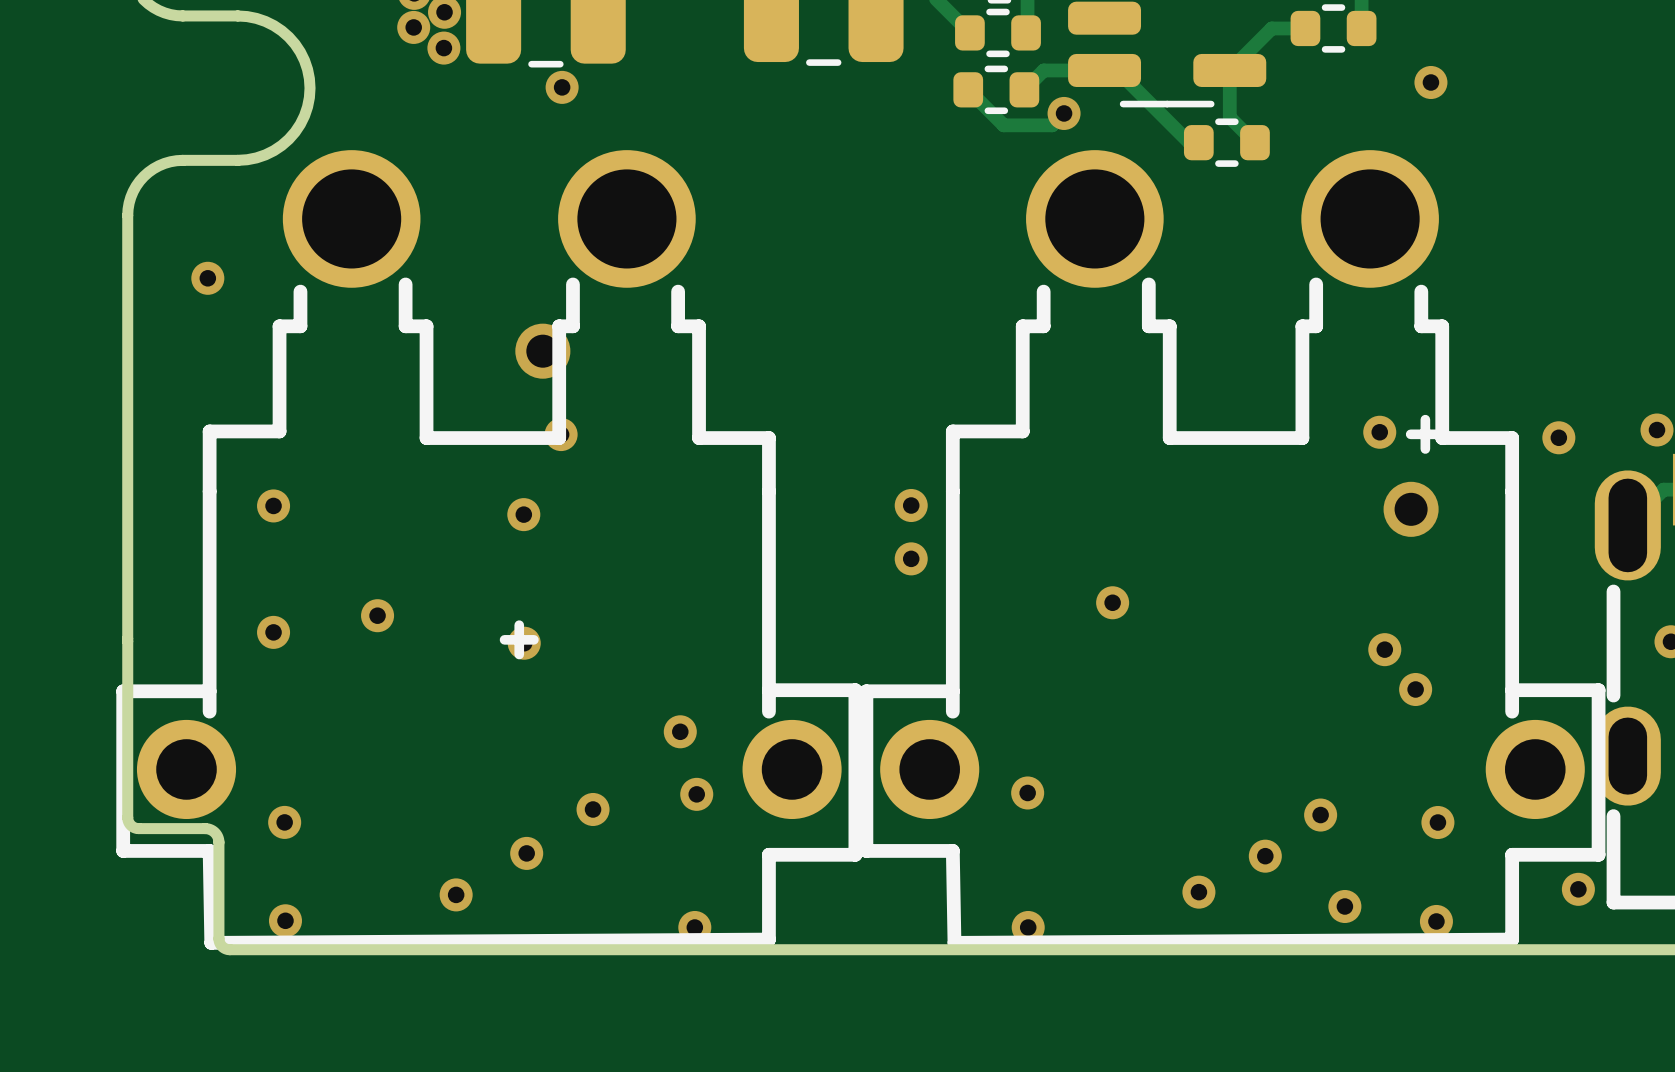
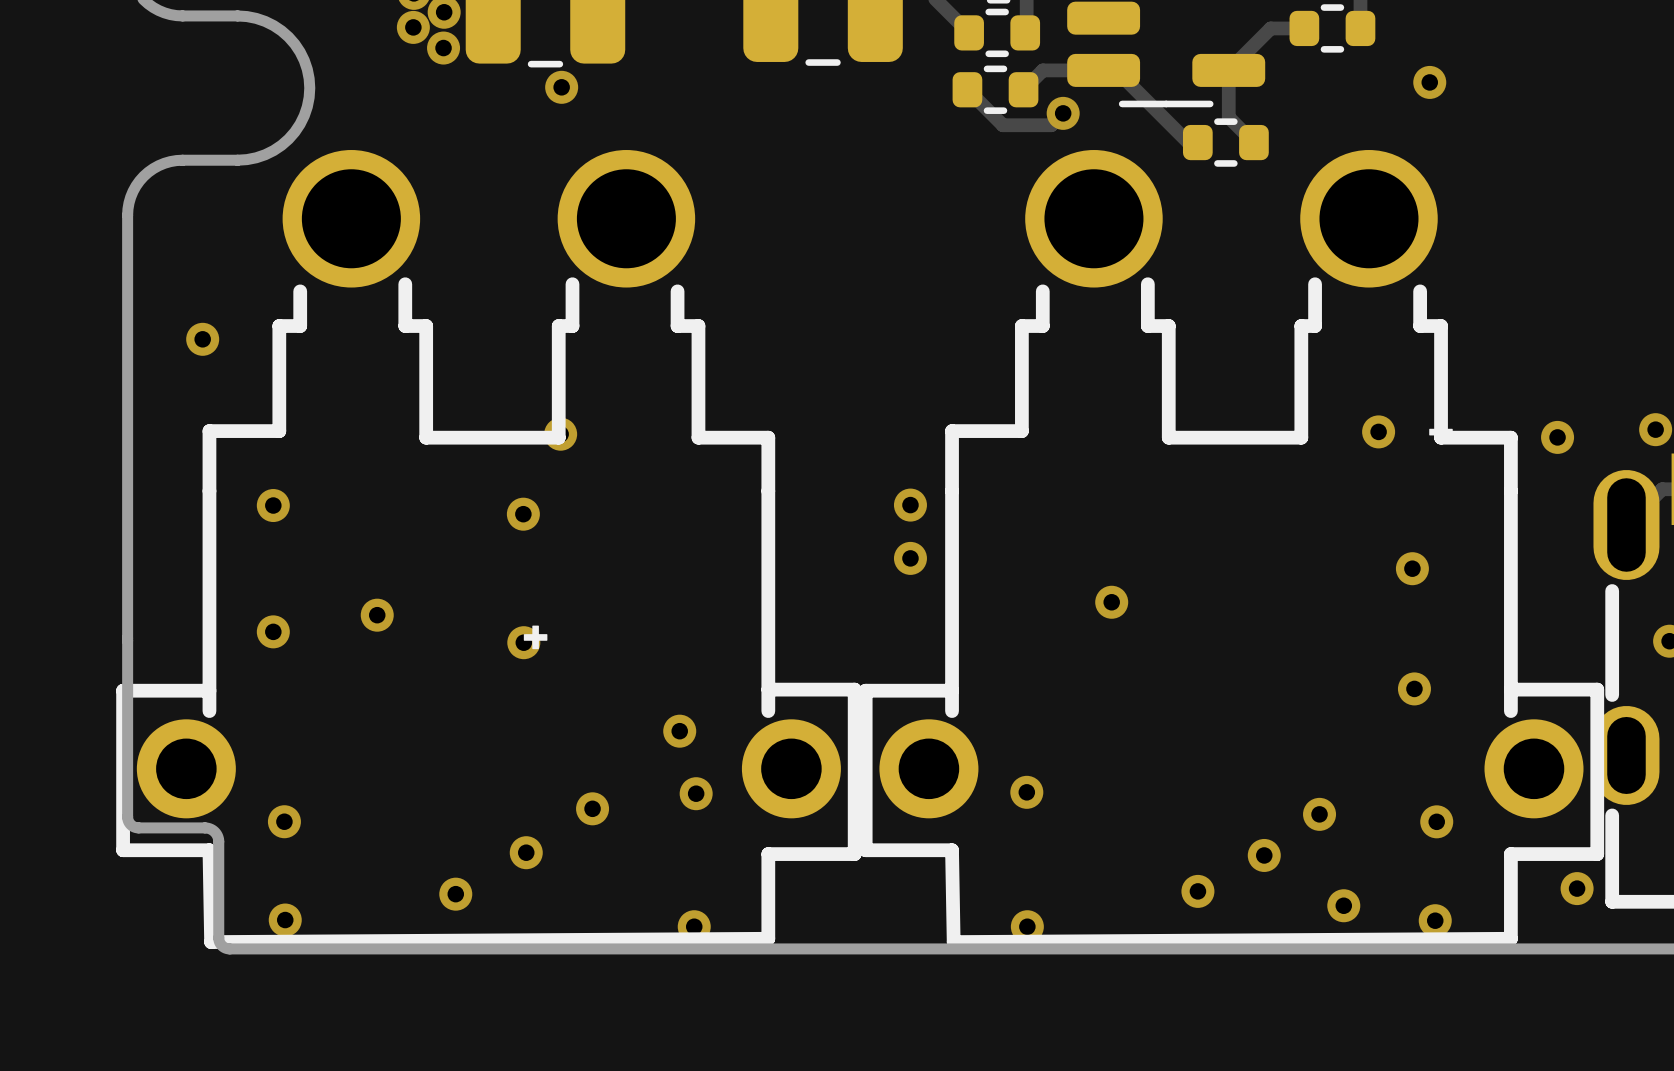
via position: (207, 278) -> (202, 339)
via: (542, 351) -> none
via: (1411, 509) -> none
via position: (1384, 649) -> (1412, 568)

